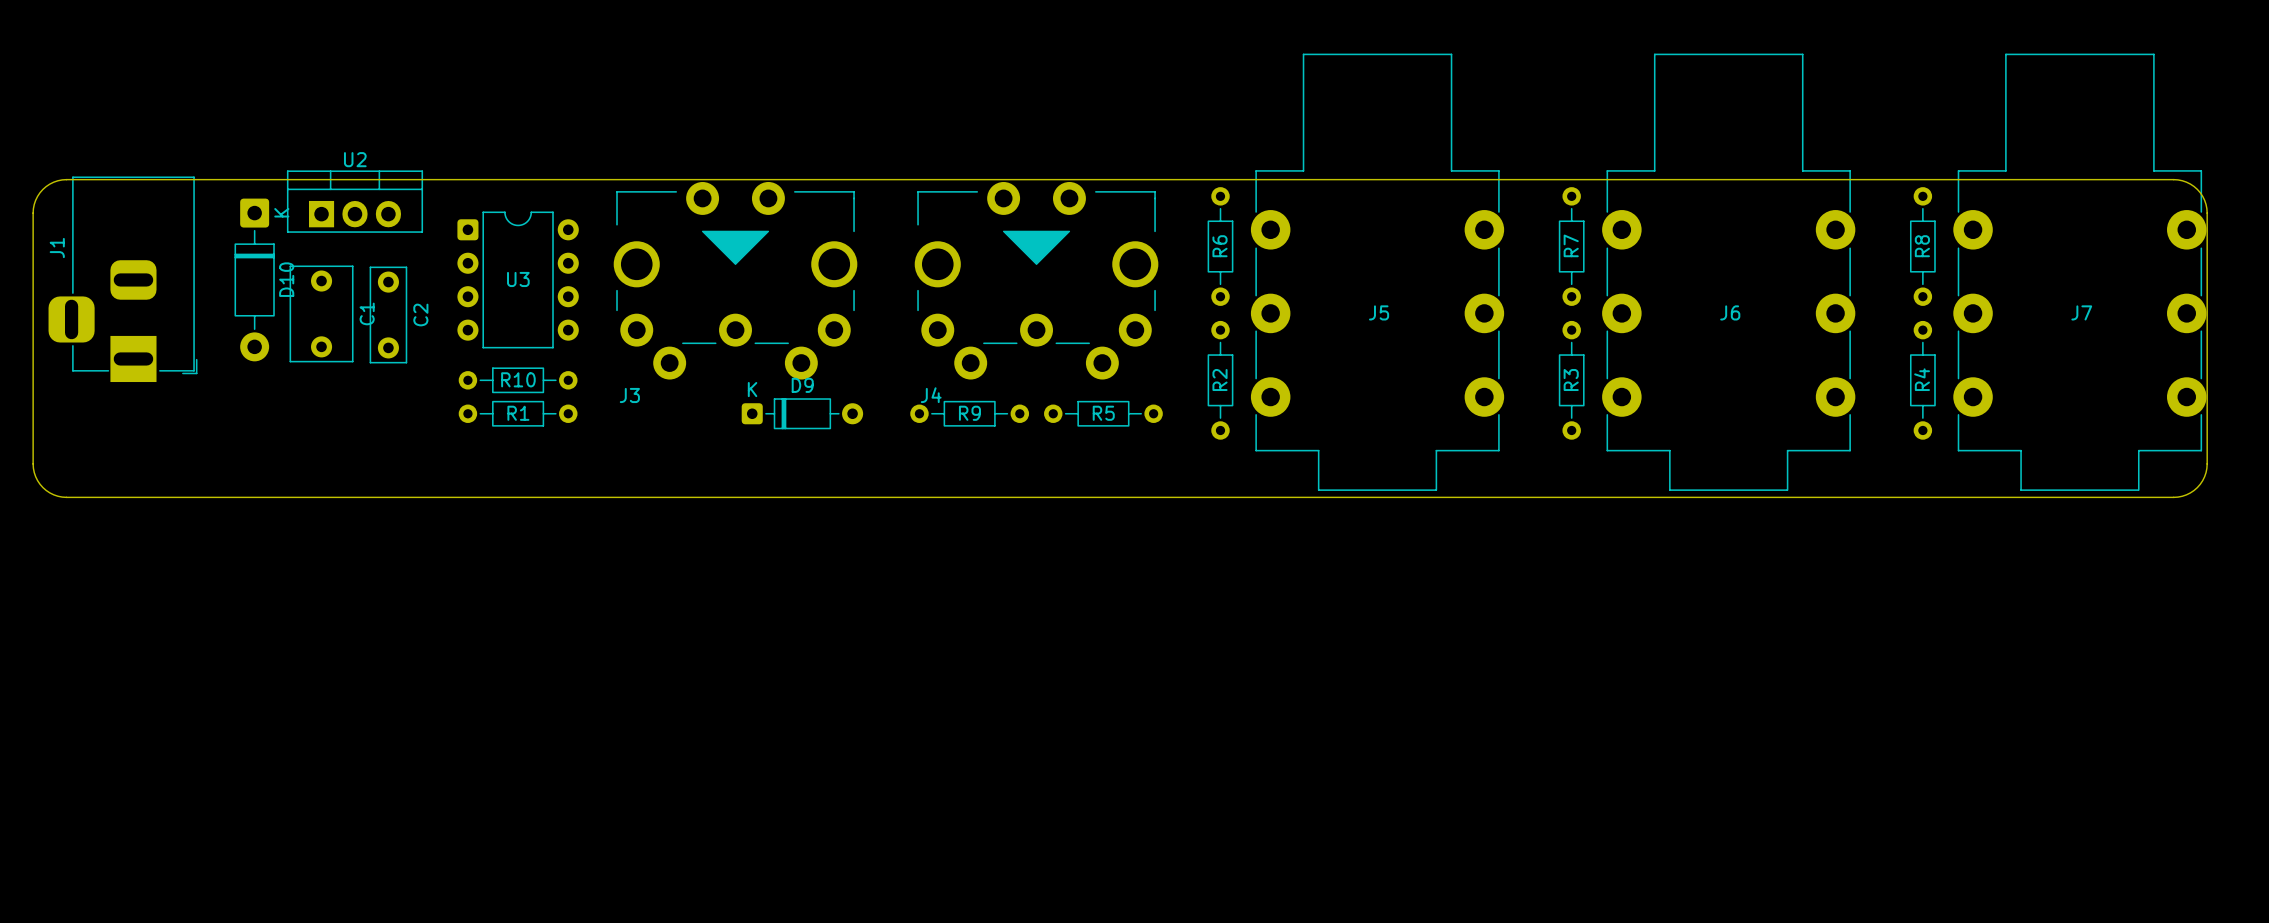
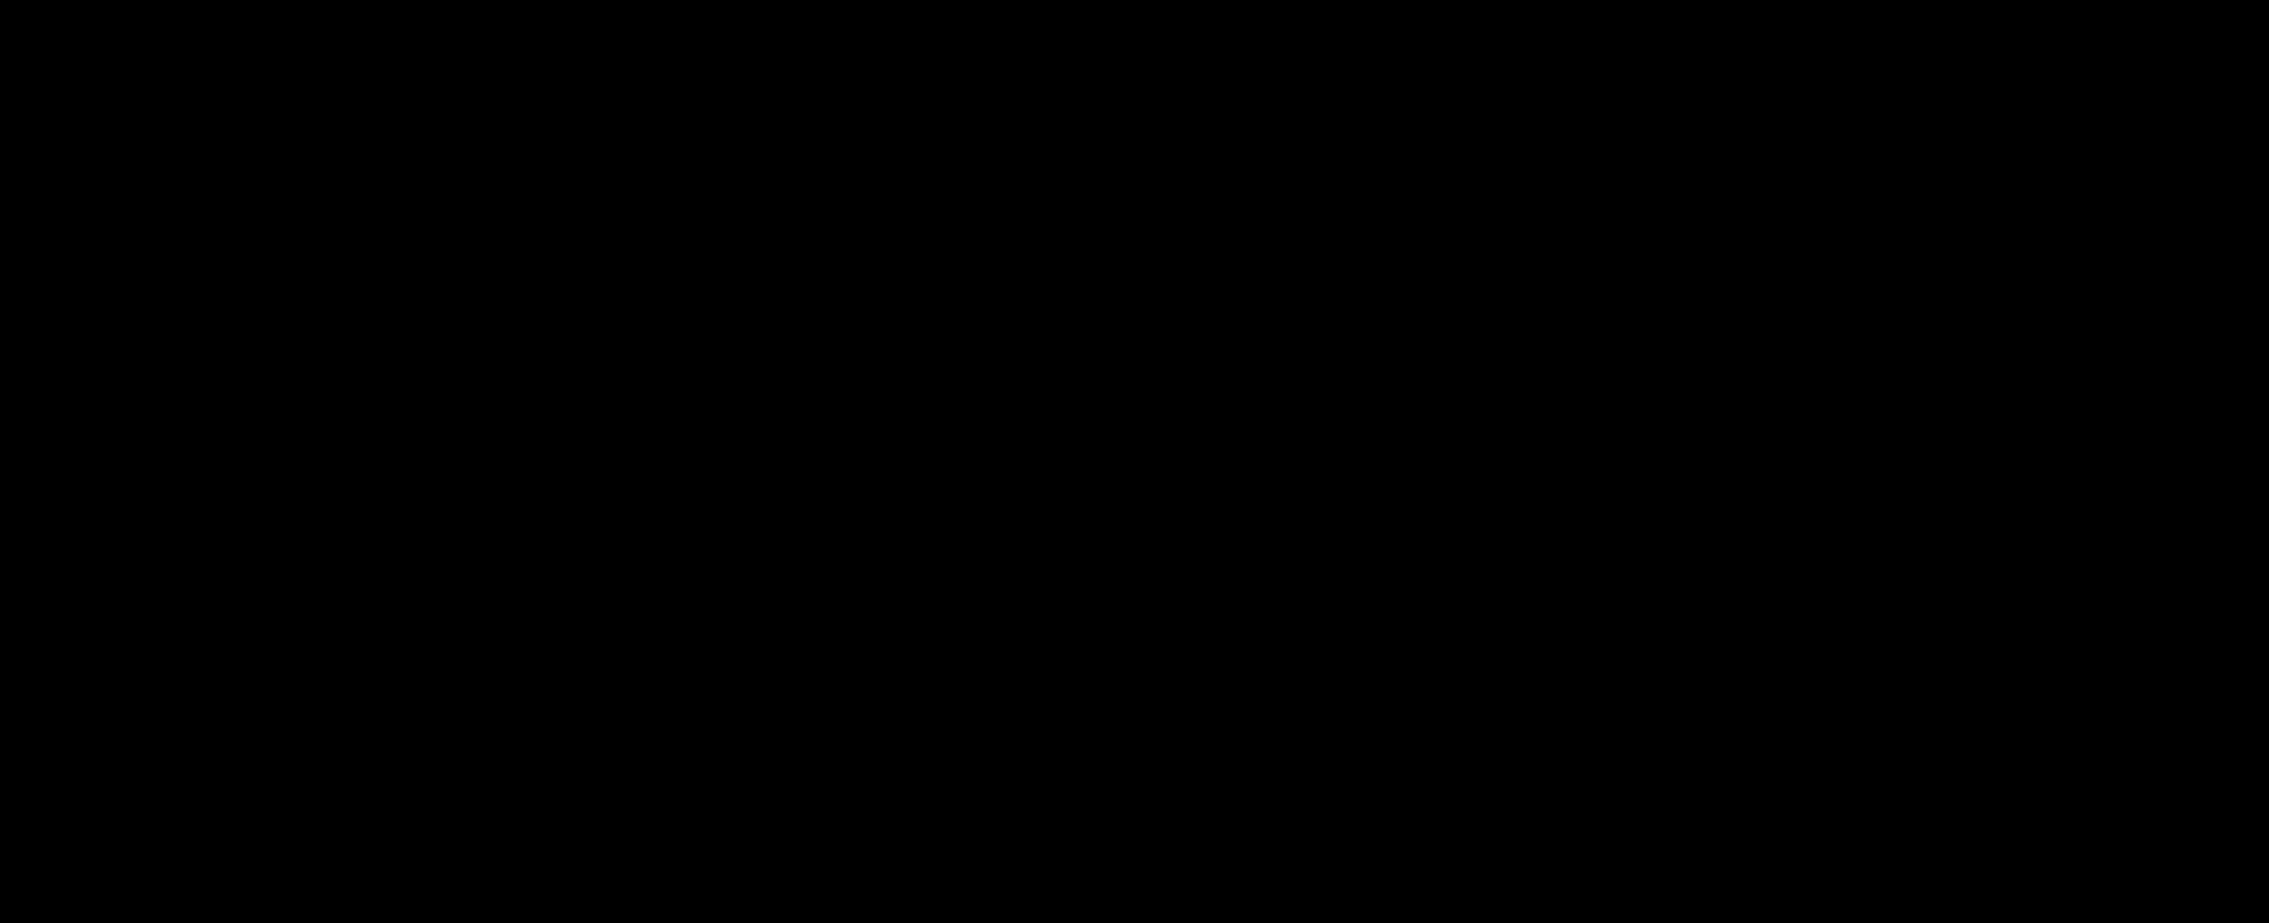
board edge: (66, 179) (2178, 179) (2190, 184) (2197, 189) (2204, 200) (2206, 208) (2206, 468) (2204, 476) (2197, 487) (2186, 494) (2173, 497) (62, 497) (49, 492) (42, 487) (35, 476) (33, 468) (33, 213) (35, 200) (42, 189) (53, 182) (66, 179) -> none
U2: (354, 201) -> none
R6: (1220, 246) -> none
R7: (1571, 246) -> none
R8: (1922, 246) -> none
J5: (1377, 272) -> none
J6: (1728, 272) -> none
J7: (2079, 272) -> none
J1: (123, 279) -> none
D10: (254, 279) -> none
U3: (518, 279) -> none
J3: (735, 280) -> none
J4: (1036, 280) -> none
C1: (321, 313) -> none
C2: (388, 314) -> none
R10: (518, 380) -> none
R2: (1220, 380) -> none
R3: (1571, 380) -> none
R4: (1922, 380) -> none
R1: (518, 413) -> none
D9: (802, 413) -> none
R9: (969, 413) -> none
R5: (1103, 413) -> none

